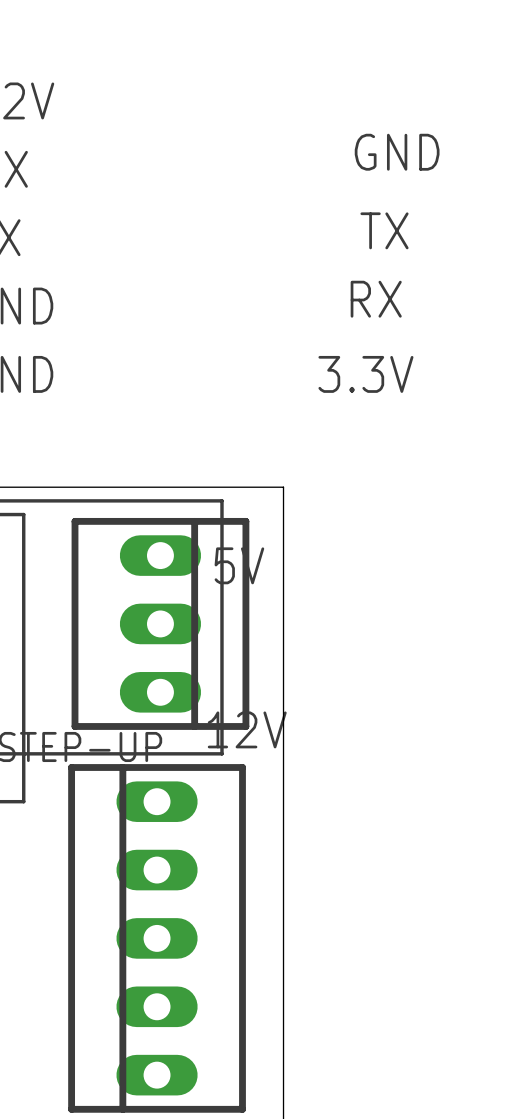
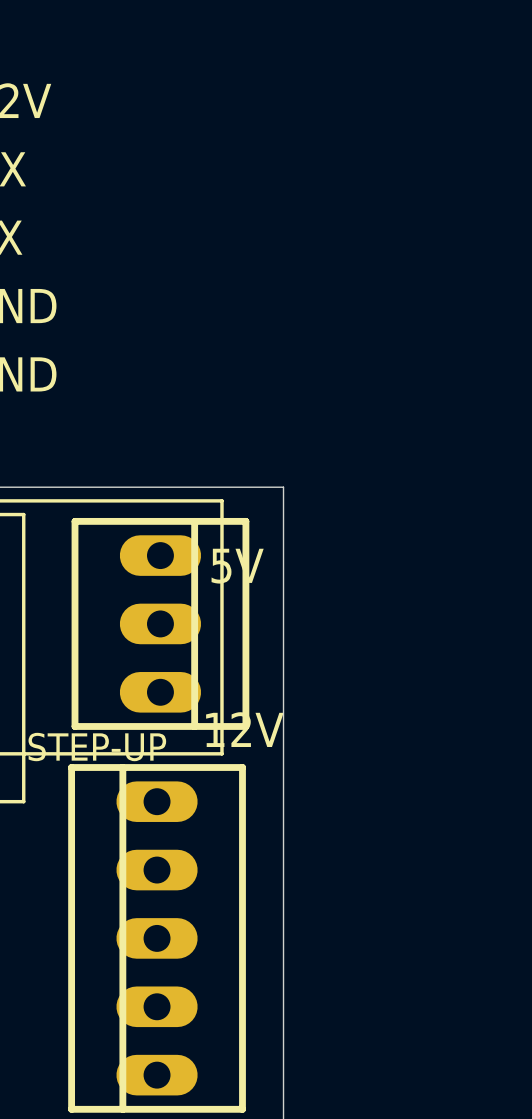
text: GND (397, 152) -> none
text: TX (384, 230) -> none
text: RX (376, 299) -> none
text: 3.3V (365, 374) -> none

